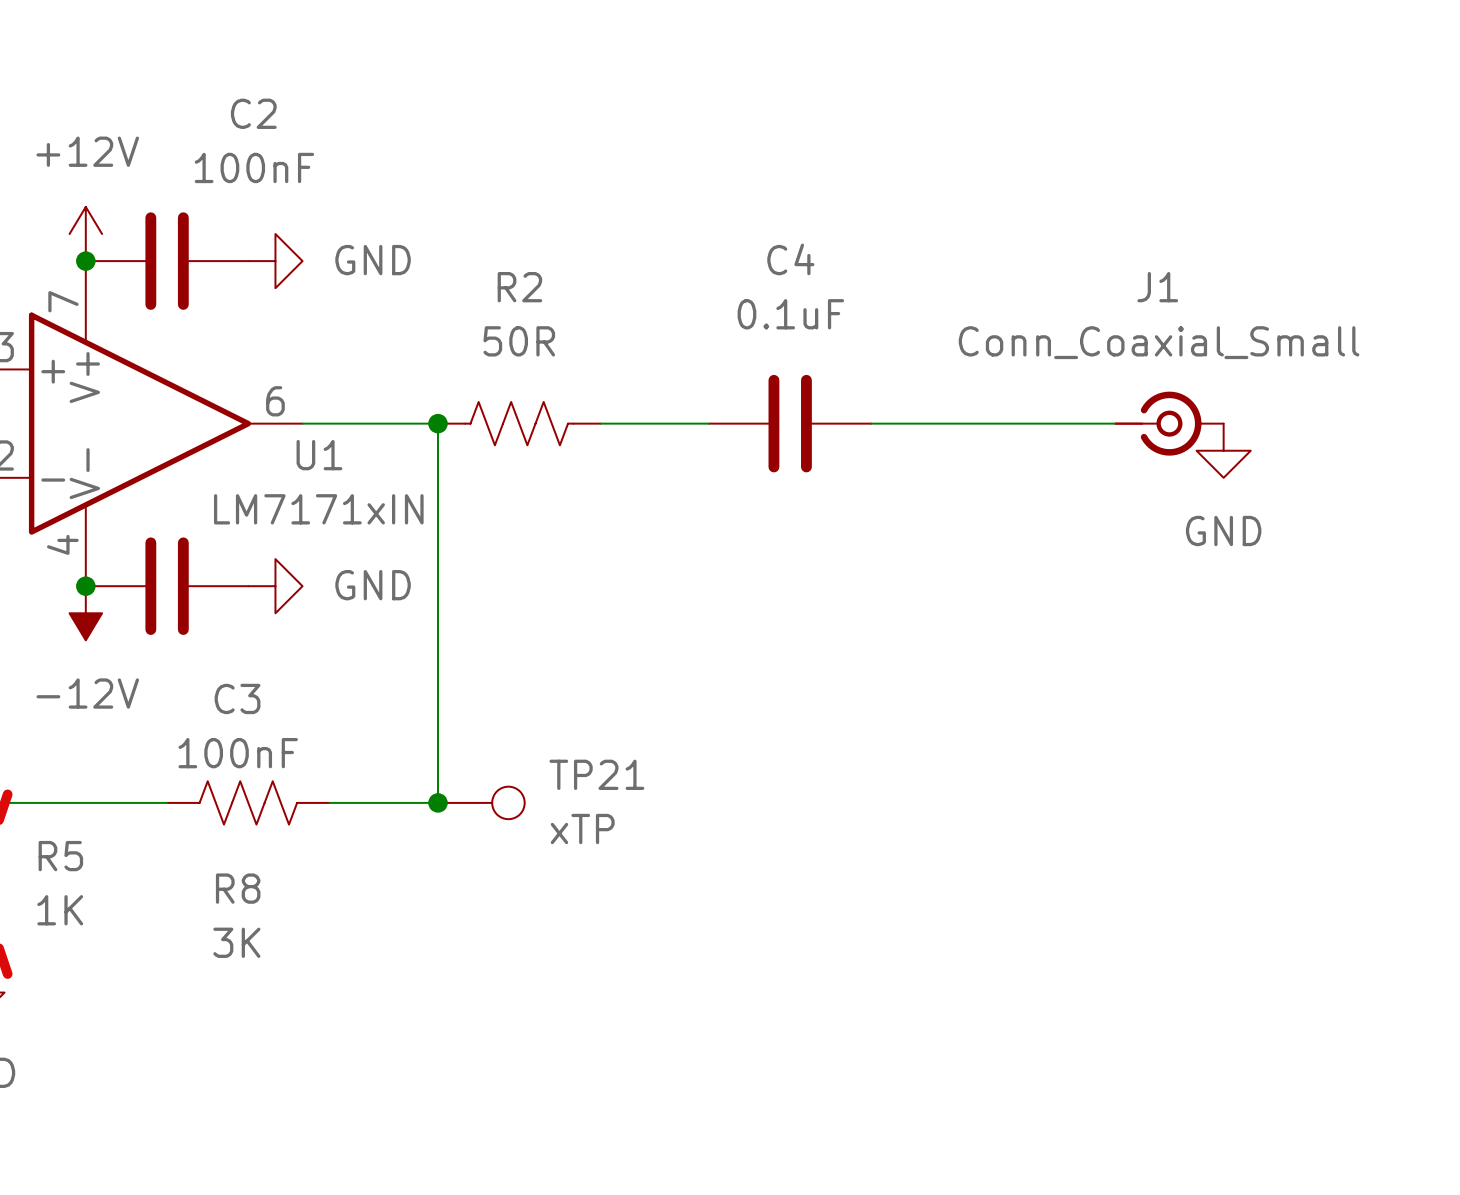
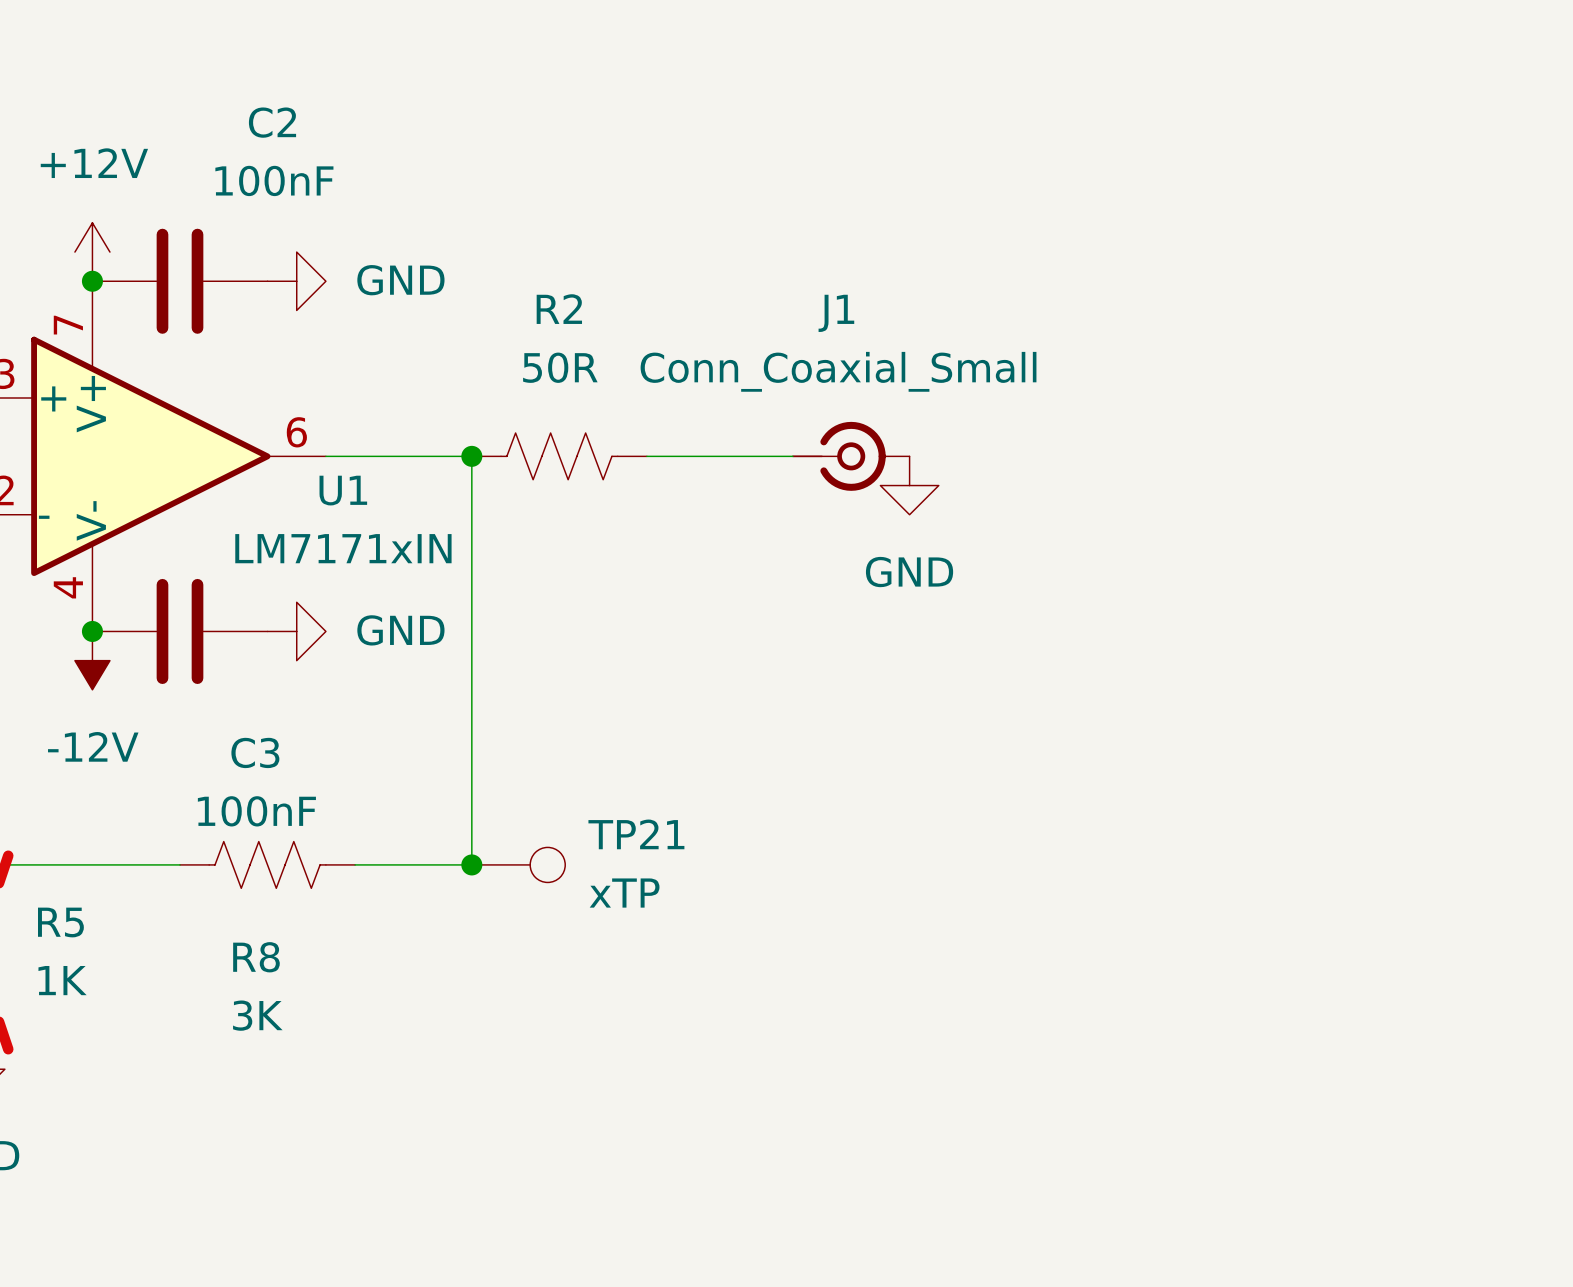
C4: 0.1uF (790, 423) -> none
wire: (871, 423) (1115, 423) -> none
J1 position: (1169, 423) -> (851, 456)
power symbol position: GND (1223, 450) -> GND (909, 485)

